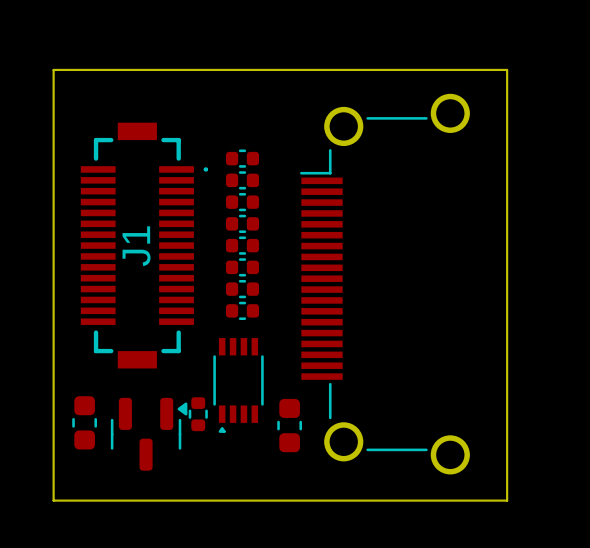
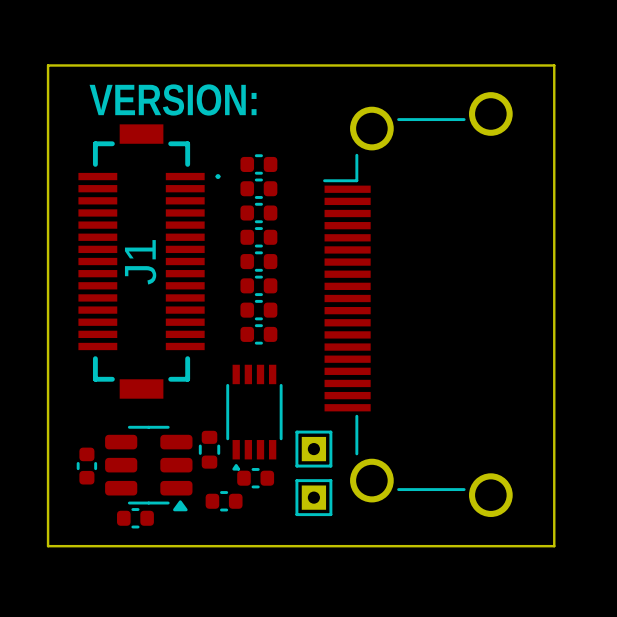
text: none -> VERSION: (173, 99)
part footprint: [72, 396, 98, 450] -> [76, 447, 98, 485]
part footprint: [110, 397, 188, 471] -> [105, 425, 193, 512]
part footprint: [277, 398, 303, 453] -> [295, 430, 333, 468]
part: none -> (255, 478)
part: none -> (313, 497)
part: none -> (224, 501)
part: none -> (135, 518)

